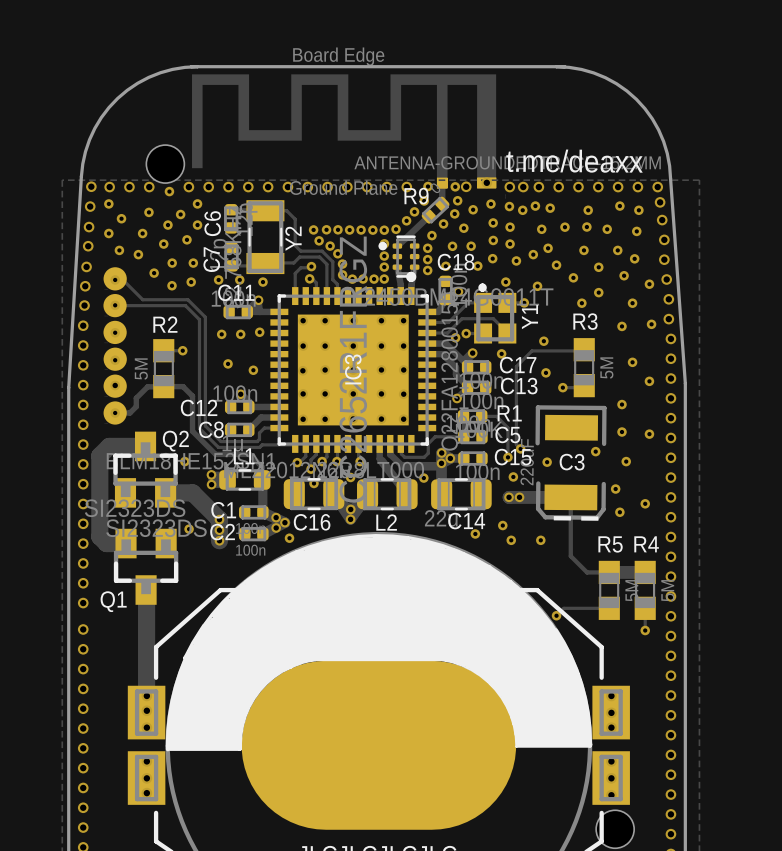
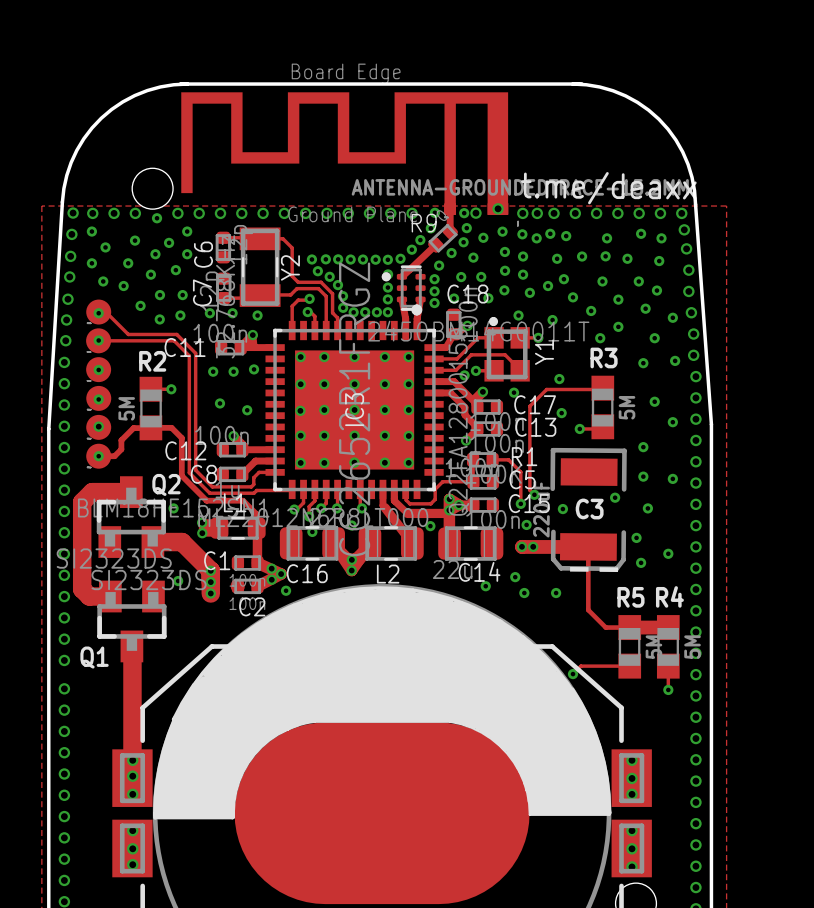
C11 name position: C11 (236, 292) -> C11 (185, 347)
C2 name position: C2 (222, 532) -> C2 (252, 606)

